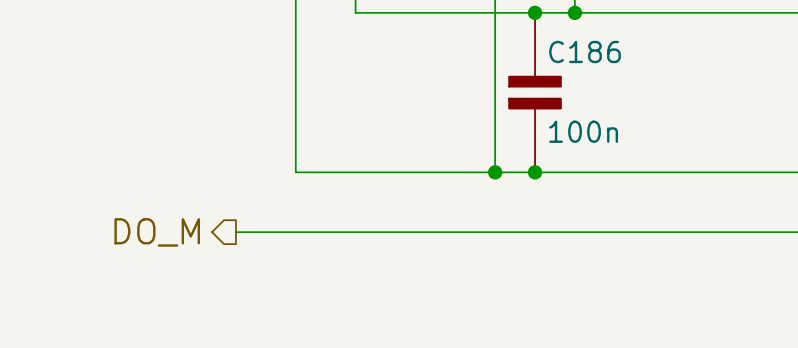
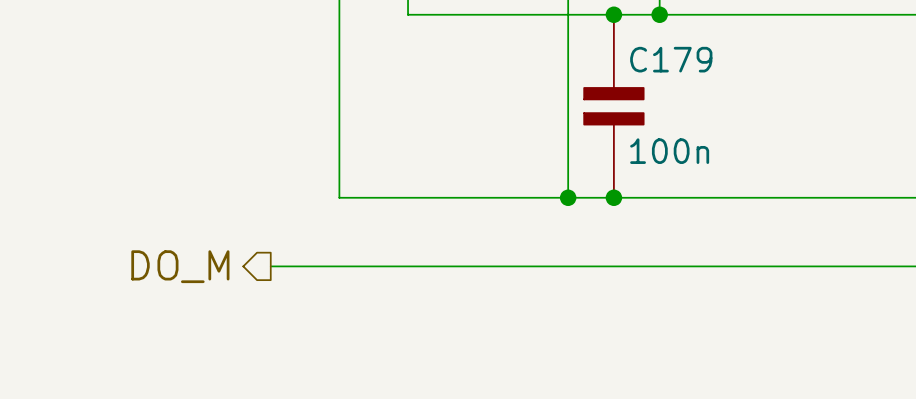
C186 name: C186 (585, 51) -> C179 (671, 59)

